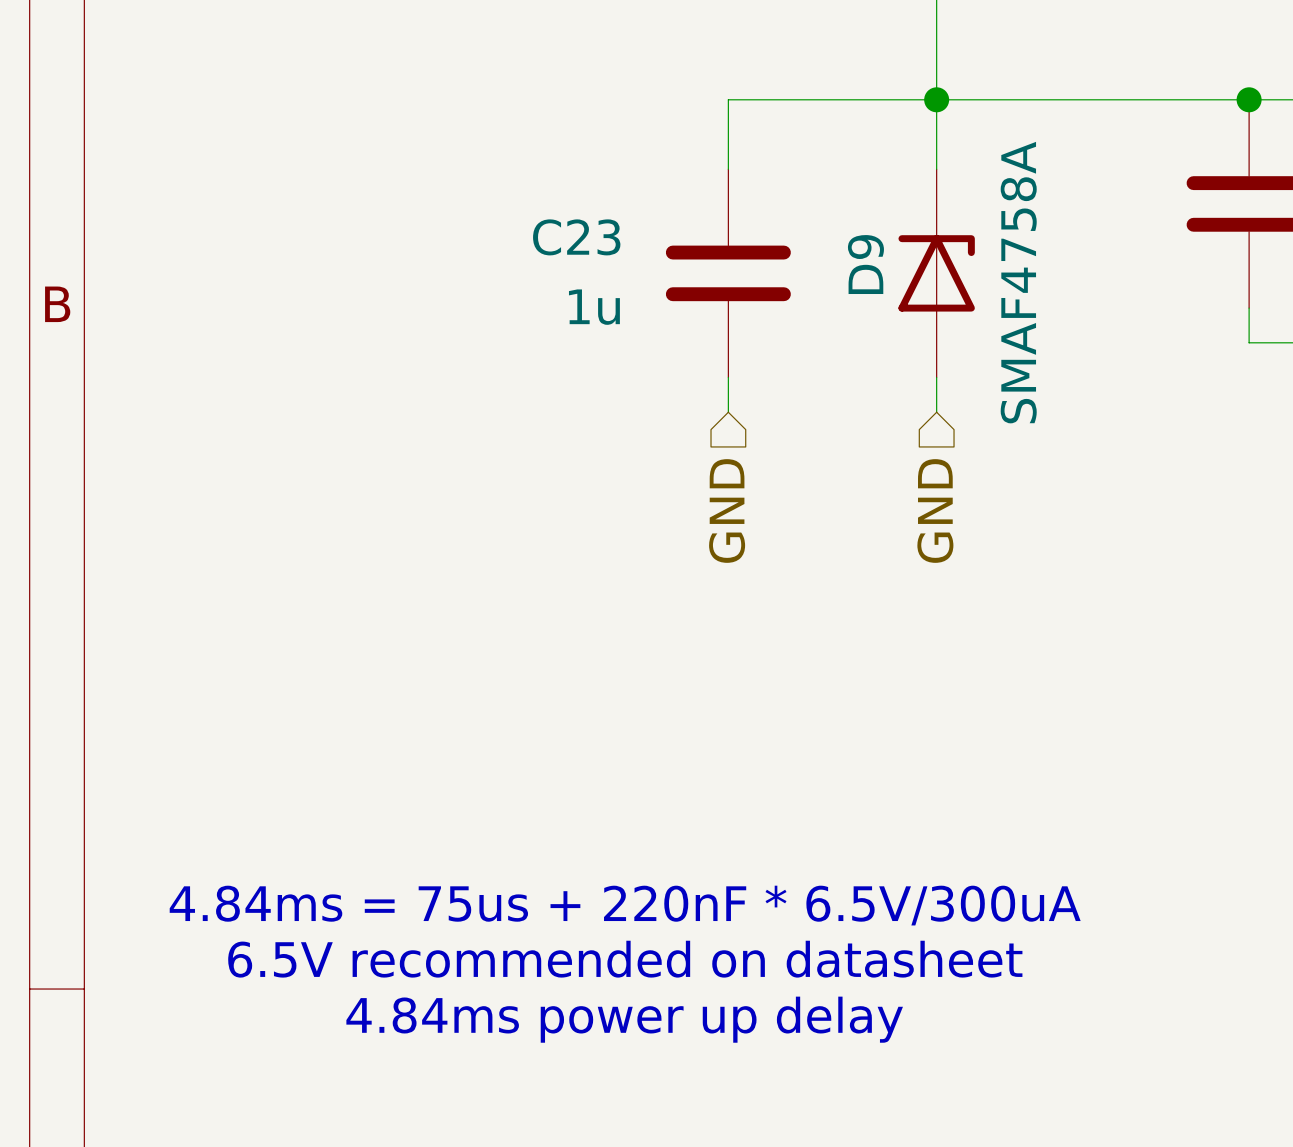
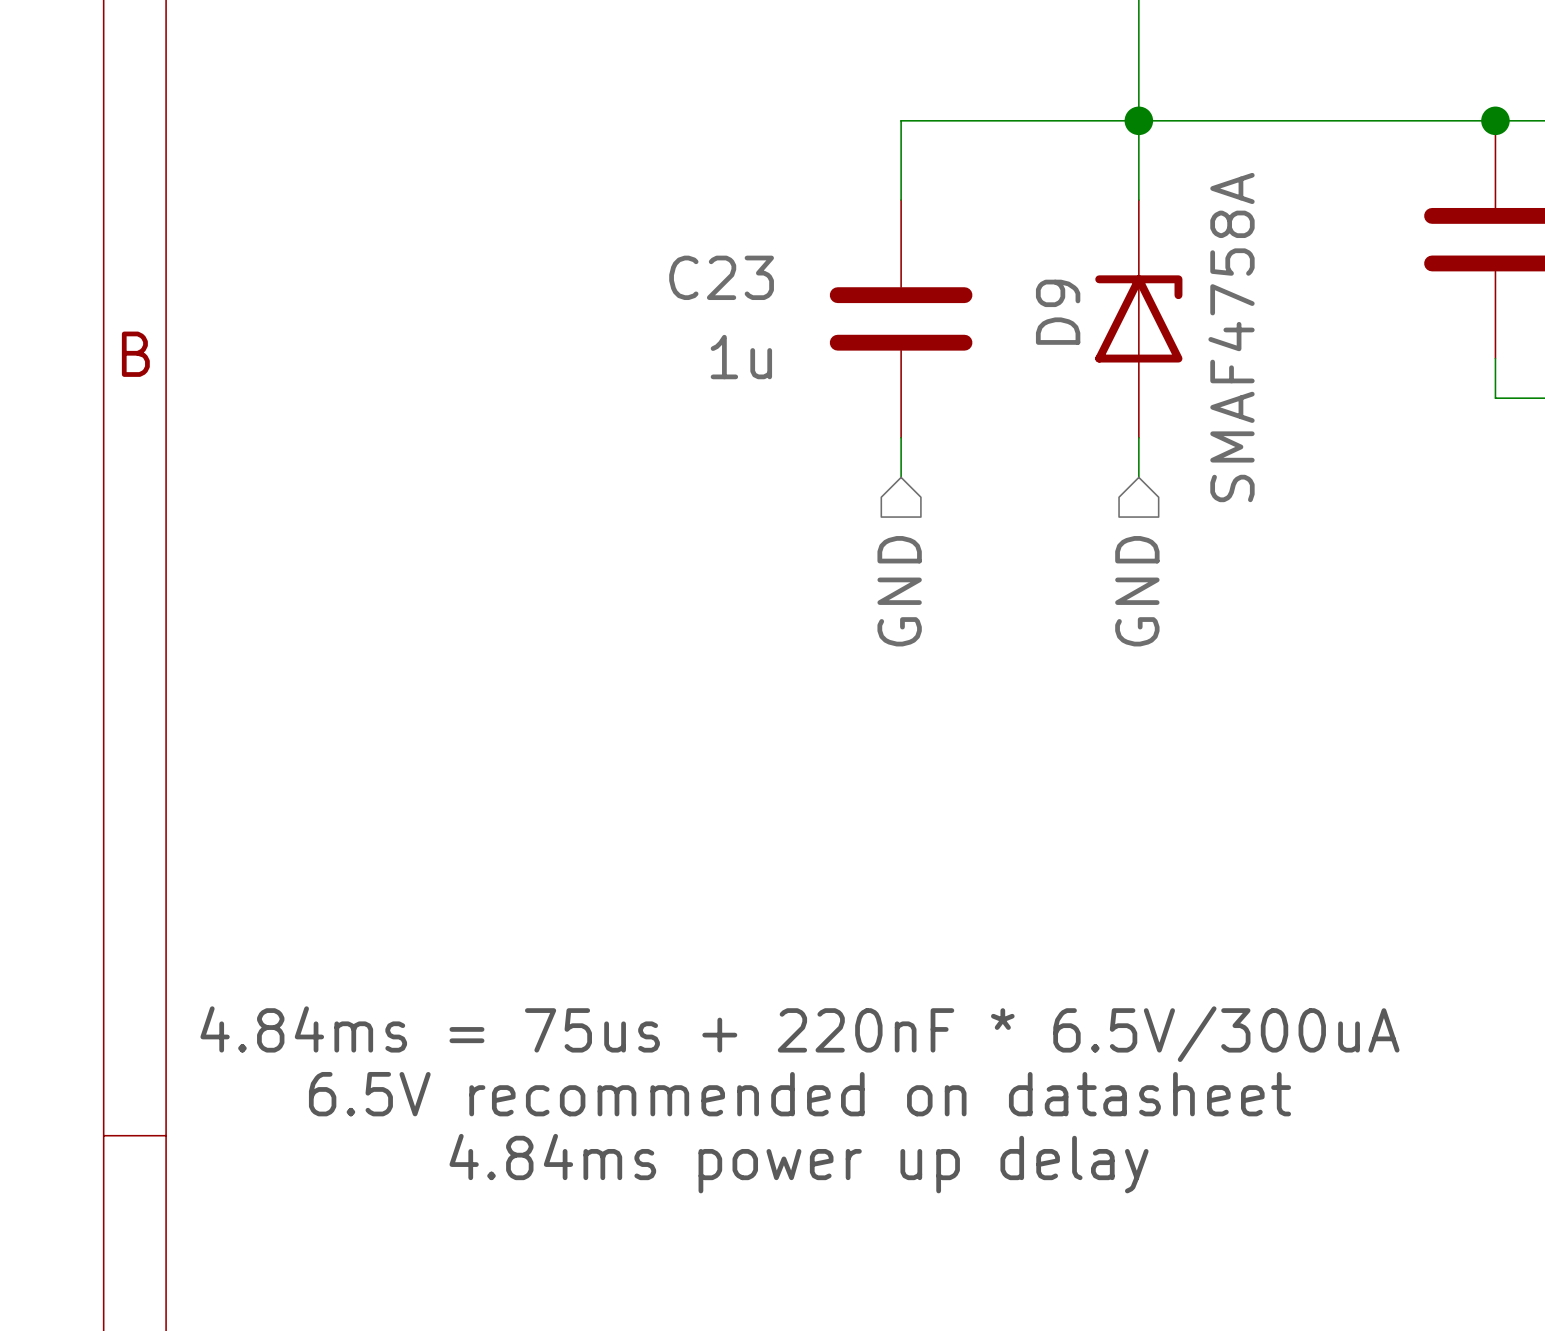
text position: 4.84ms = 75us + 220nF * 6.5V/300uA (625, 905) -> 4.84ms = 75us + 220nF * 6.5V/300uA (799, 1034)
text position: 6.5V recommended on datasheet (625, 959) -> 6.5V recommended on datasheet (799, 1094)
text position: 4.84ms power up delay (624, 1019) -> 4.84ms power up delay (799, 1163)

